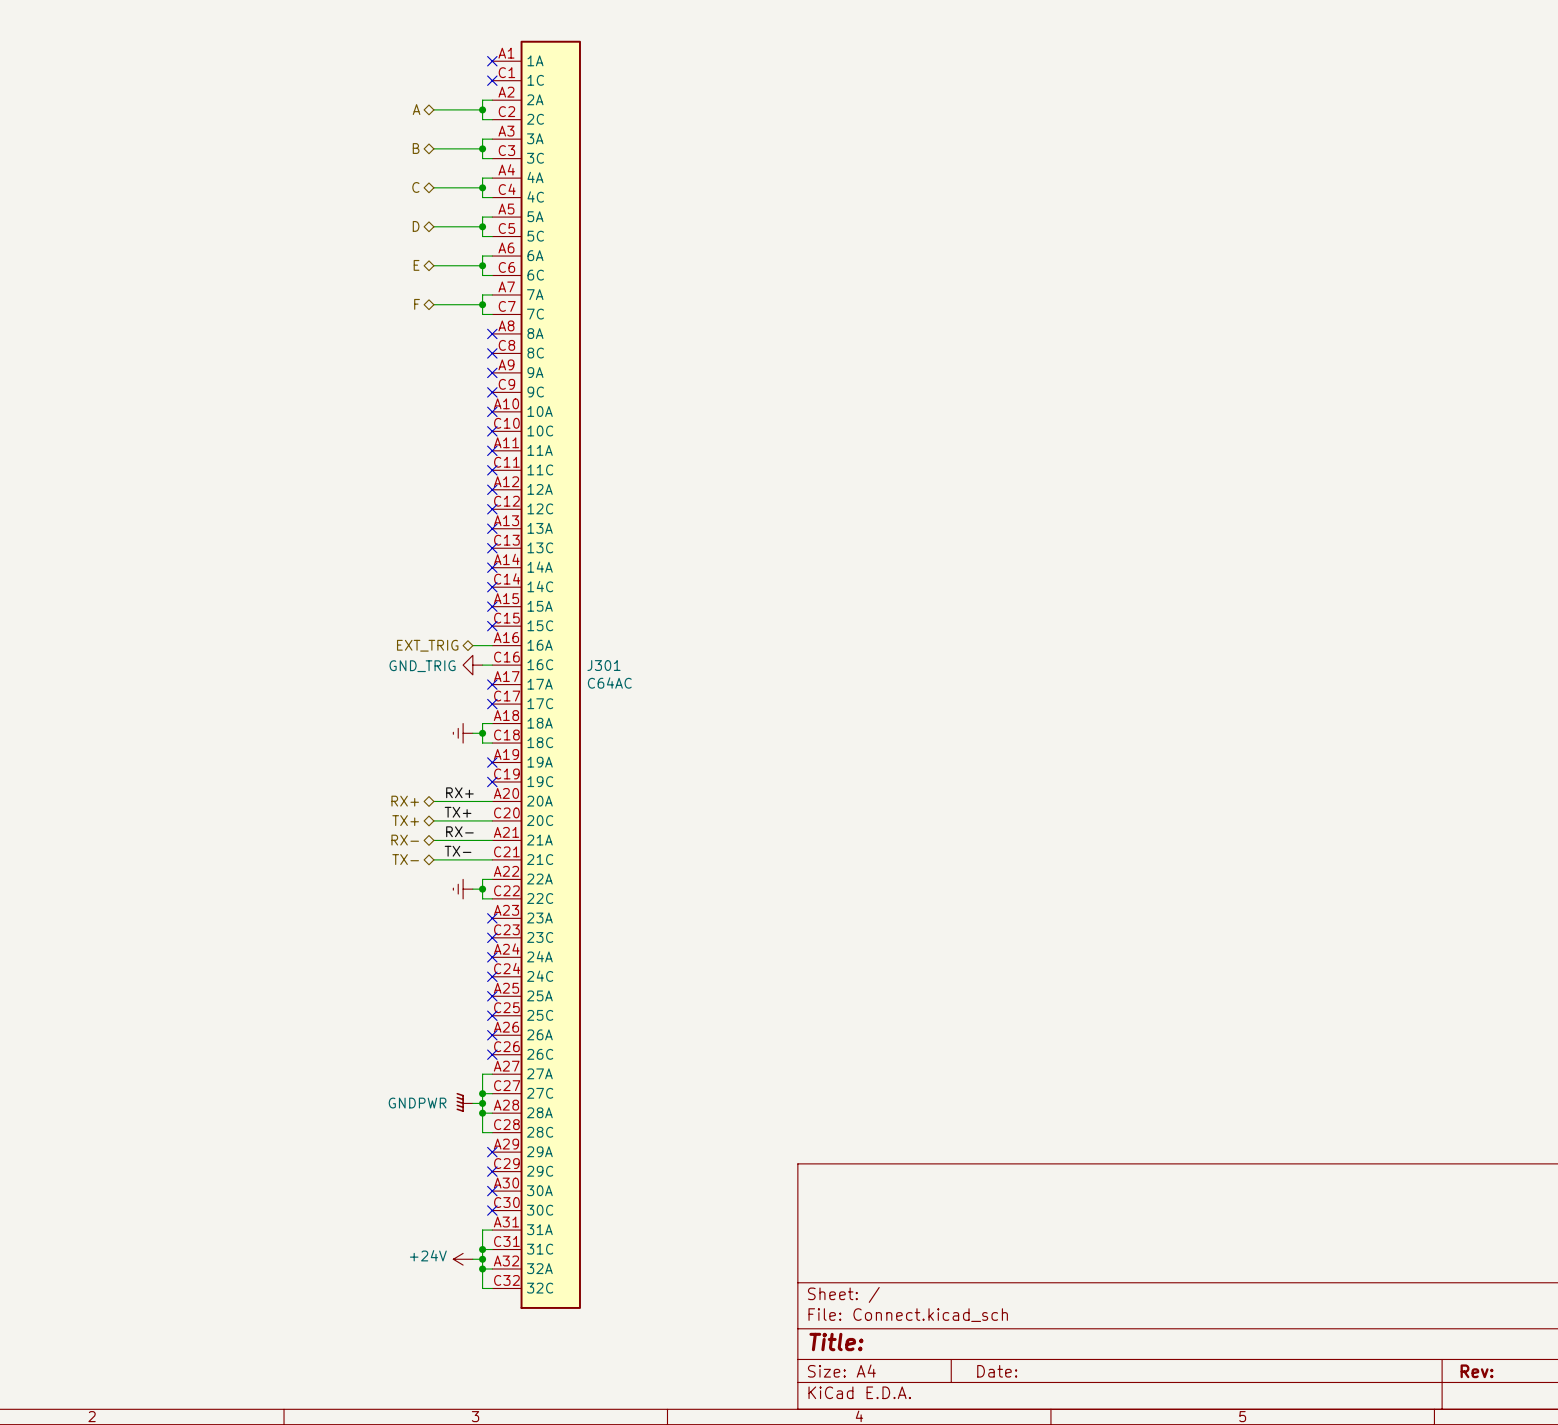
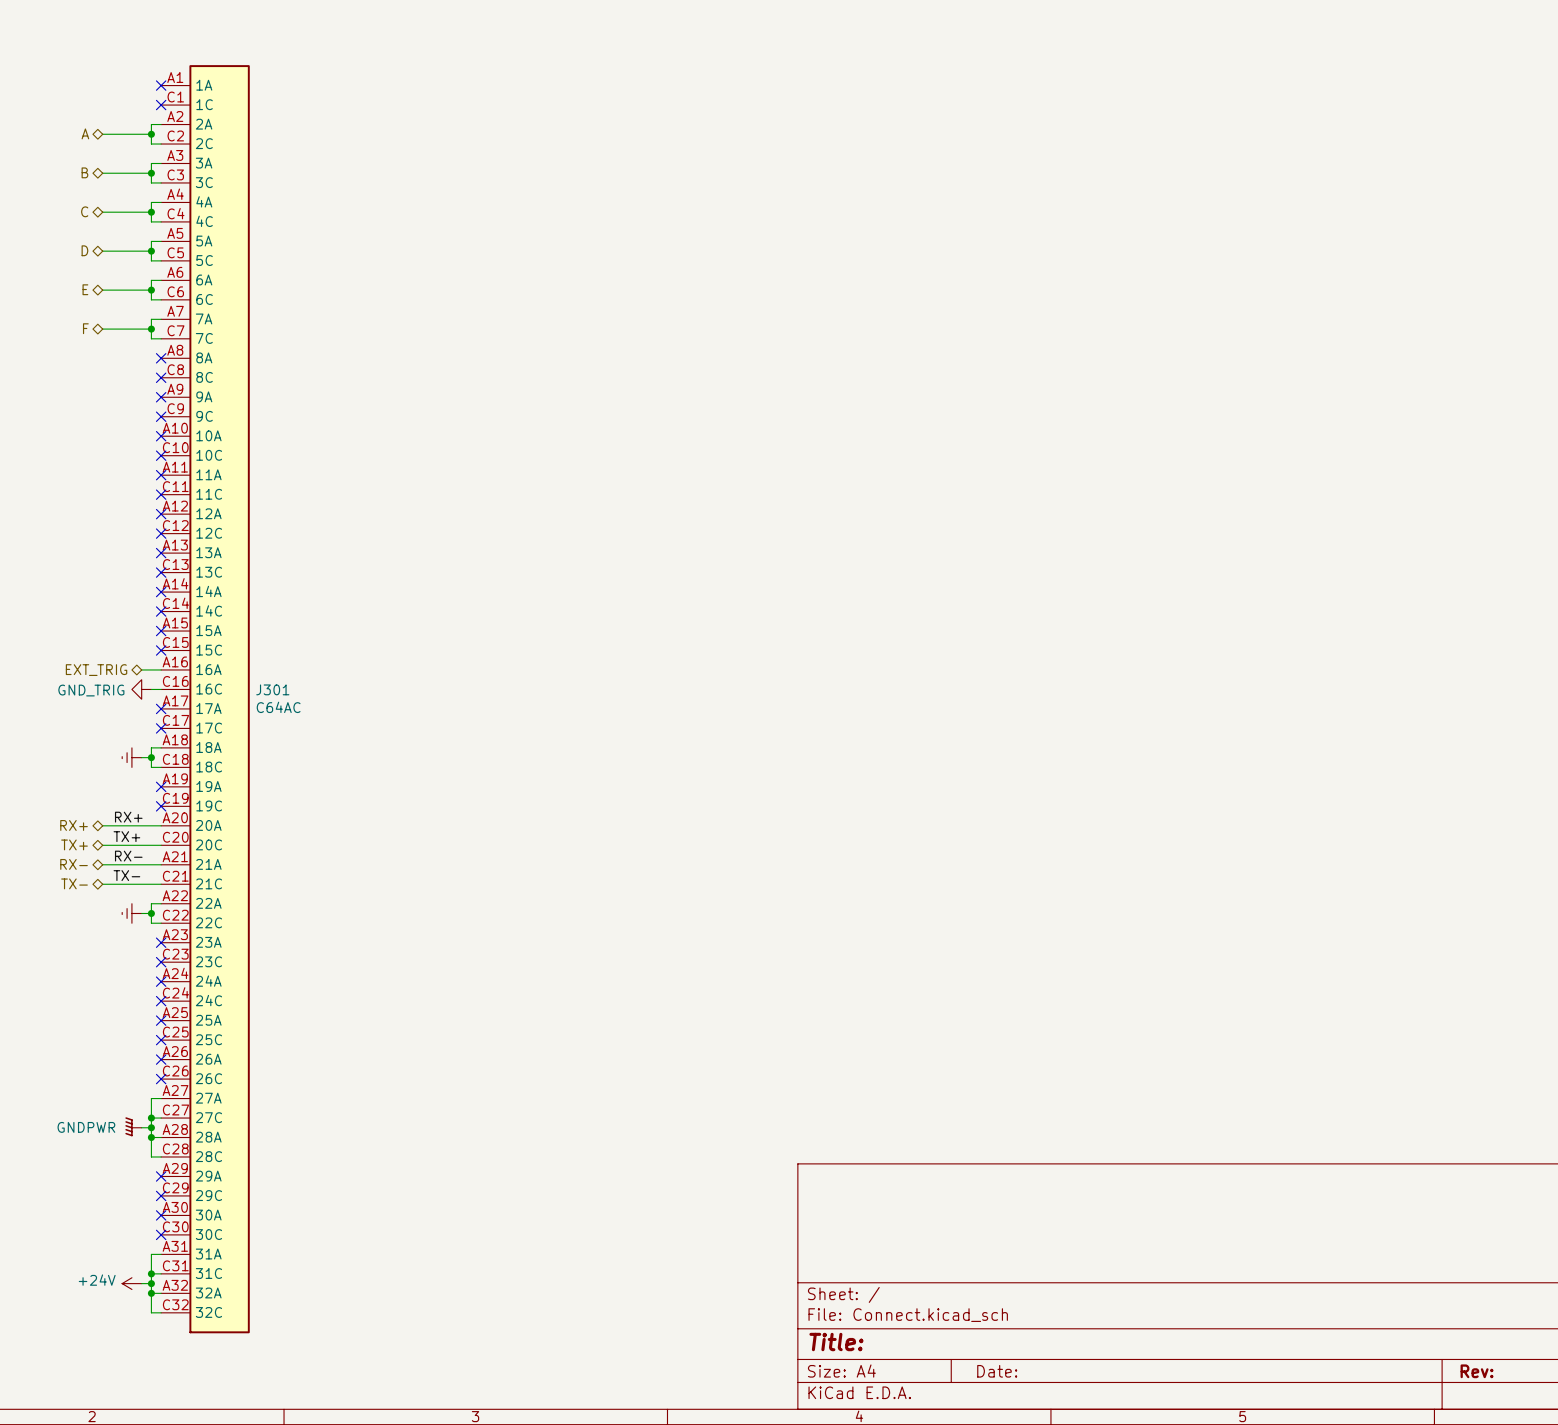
no-connect mark: (492, 61) -> none
no-connect mark: (492, 80) -> none
no-connect mark: none -> (161, 85)
wire: (492, 100) (482, 100) (482, 119) (492, 119) -> none
no-connect mark: none -> (161, 105)
hierarchical label: A (416, 109) -> none
wire: (433, 109) (482, 109) -> none
junction: (482, 109) -> none
wire: none -> (161, 124) (151, 124) (151, 144) (161, 144)
hierarchical label: none -> A (85, 133)
wire: none -> (102, 134) (151, 134)
junction: none -> (151, 134)
wire: (492, 139) (482, 139) (482, 158) (492, 158) -> none
hierarchical label: B (416, 148) -> none
wire: (433, 148) (482, 148) -> none
junction: (482, 148) -> none
wire: none -> (161, 163) (151, 163) (151, 182) (161, 182)
hierarchical label: none -> B (84, 172)
wire: none -> (102, 173) (151, 173)
junction: none -> (151, 173)
wire: (492, 178) (482, 178) (482, 197) (492, 197) -> none
hierarchical label: C (415, 187) -> none
wire: (433, 187) (482, 187) -> none
junction: (482, 187) -> none
wire: none -> (161, 202) (151, 202) (151, 221) (161, 221)
hierarchical label: none -> C (84, 211)
wire: none -> (102, 212) (151, 212)
junction: none -> (151, 212)
wire: (492, 217) (482, 217) (482, 236) (492, 236) -> none
hierarchical label: D (416, 226) -> none
wire: (433, 226) (482, 226) -> none
junction: (482, 226) -> none
wire: none -> (161, 241) (151, 241) (151, 260) (161, 260)
hierarchical label: none -> D (84, 250)
wire: none -> (102, 251) (151, 251)
junction: none -> (151, 251)
wire: (492, 256) (482, 256) (482, 275) (492, 275) -> none
hierarchical label: E (416, 265) -> none
wire: (433, 265) (482, 265) -> none
junction: (482, 265) -> none
wire: none -> (161, 280) (151, 280) (151, 299) (161, 299)
hierarchical label: none -> E (85, 289)
wire: none -> (102, 290) (151, 290)
junction: none -> (151, 290)
wire: (492, 294) (482, 294) (482, 314) (492, 314) -> none
hierarchical label: F (417, 304) -> none
wire: (433, 304) (482, 304) -> none
junction: (482, 304) -> none
wire: none -> (161, 319) (151, 319) (151, 338) (161, 338)
hierarchical label: none -> F (85, 328)
wire: none -> (102, 329) (151, 329)
junction: none -> (151, 329)
no-connect mark: (492, 333) -> none
no-connect mark: (492, 353) -> none
no-connect mark: none -> (161, 358)
no-connect mark: (492, 372) -> none
no-connect mark: none -> (161, 377)
no-connect mark: (492, 392) -> none
no-connect mark: none -> (161, 397)
no-connect mark: (492, 411) -> none
no-connect mark: none -> (161, 416)
no-connect mark: (492, 431) -> none
no-connect mark: none -> (161, 436)
no-connect mark: (492, 450) -> none
no-connect mark: none -> (161, 455)
no-connect mark: (492, 470) -> none
no-connect mark: none -> (161, 475)
no-connect mark: (492, 489) -> none
no-connect mark: none -> (161, 494)
no-connect mark: (492, 509) -> none
no-connect mark: none -> (161, 514)
no-connect mark: (492, 528) -> none
no-connect mark: none -> (161, 533)
no-connect mark: (492, 548) -> none
no-connect mark: none -> (161, 553)
no-connect mark: (492, 567) -> none
no-connect mark: none -> (161, 572)
no-connect mark: (492, 587) -> none
no-connect mark: none -> (161, 592)
no-connect mark: (492, 606) -> none
no-connect mark: none -> (161, 611)
no-connect mark: (492, 626) -> none
no-connect mark: none -> (161, 631)
hierarchical label: EXT_TRIG (427, 645) -> none
wire: (472, 645) (492, 645) -> none
no-connect mark: none -> (161, 650)
power symbol: GND_TRIG (472, 665) -> none
wire: (482, 665) (492, 665) -> none
wire: none -> (141, 669) (161, 669)
hierarchical label: none -> EXT_TRIG (96, 670)
J301 position: (536, 674) -> (205, 699)
no-connect mark: (492, 684) -> none
power symbol: none -> GND_TRIG (141, 689)
wire: none -> (151, 689) (161, 689)
no-connect mark: (492, 704) -> none
no-connect mark: none -> (161, 708)
wire: (492, 723) (482, 723) (482, 743) (492, 743) -> none
no-connect mark: none -> (161, 728)
power symbol: (463, 733) -> none
wire: (472, 733) (482, 733) -> none
junction: (482, 733) -> none
wire: none -> (161, 747) (151, 747) (151, 767) (161, 767)
power symbol: none -> (131, 757)
wire: none -> (141, 757) (151, 757)
junction: none -> (151, 757)
no-connect mark: (492, 762) -> none
no-connect mark: (492, 781) -> none
no-connect mark: none -> (161, 786)
label: RX+ (459, 792) -> none
hierarchical label: RX+ (405, 801) -> none
wire: (433, 801) (492, 801) -> none
no-connect mark: none -> (161, 806)
label: TX+ (458, 812) -> none
label: none -> RX+ (128, 817)
hierarchical label: TX+ (405, 820) -> none
wire: (433, 820) (492, 820) -> none
hierarchical label: none -> RX+ (74, 825)
wire: none -> (102, 825) (161, 825)
label: RX- (459, 831) -> none
label: none -> TX+ (126, 836)
hierarchical label: RX- (405, 840) -> none
wire: (433, 840) (492, 840) -> none
hierarchical label: none -> TX+ (74, 844)
wire: none -> (102, 845) (161, 845)
label: TX- (458, 851) -> none
label: none -> RX- (128, 856)
hierarchical label: TX- (405, 859) -> none
wire: (433, 859) (492, 859) -> none
hierarchical label: none -> RX- (74, 864)
wire: none -> (102, 864) (161, 864)
label: none -> TX- (126, 875)
wire: (492, 879) (482, 879) (482, 898) (492, 898) -> none
hierarchical label: none -> TX- (74, 883)
wire: none -> (102, 884) (161, 884)
power symbol: (463, 889) -> none
wire: (472, 889) (482, 889) -> none
junction: (482, 889) -> none
wire: none -> (161, 903) (151, 903) (151, 923) (161, 923)
power symbol: none -> (131, 913)
wire: none -> (141, 913) (151, 913)
junction: none -> (151, 913)
no-connect mark: (492, 918) -> none
no-connect mark: (492, 937) -> none
no-connect mark: none -> (161, 942)
no-connect mark: (492, 957) -> none
no-connect mark: none -> (161, 962)
no-connect mark: (492, 976) -> none
no-connect mark: none -> (161, 981)
no-connect mark: (492, 996) -> none
no-connect mark: none -> (161, 1001)
no-connect mark: (492, 1015) -> none
no-connect mark: none -> (161, 1020)
no-connect mark: (492, 1035) -> none
no-connect mark: none -> (161, 1040)
no-connect mark: (492, 1054) -> none
no-connect mark: none -> (161, 1059)
wire: (492, 1074) (482, 1074) (482, 1132) (492, 1132) -> none
no-connect mark: none -> (161, 1079)
wire: (482, 1093) (492, 1093) -> none
junction: (482, 1093) -> none
wire: none -> (161, 1098) (151, 1098) (151, 1156) (161, 1156)
power symbol: GNDPWR (464, 1102) -> none
wire: (472, 1103) (482, 1103) -> none
junction: (482, 1103) -> none
wire: (482, 1113) (492, 1113) -> none
junction: (482, 1113) -> none
wire: none -> (151, 1118) (161, 1118)
junction: none -> (151, 1118)
power symbol: none -> GNDPWR (133, 1126)
wire: none -> (141, 1127) (151, 1127)
junction: none -> (151, 1127)
wire: none -> (151, 1137) (161, 1137)
junction: none -> (151, 1137)
no-connect mark: (492, 1152) -> none
no-connect mark: (492, 1171) -> none
no-connect mark: none -> (161, 1176)
no-connect mark: (492, 1191) -> none
no-connect mark: none -> (161, 1195)
no-connect mark: (492, 1210) -> none
no-connect mark: none -> (161, 1215)
wire: (492, 1230) (482, 1230) (482, 1288) (492, 1288) -> none
no-connect mark: none -> (161, 1234)
wire: (482, 1249) (492, 1249) -> none
junction: (482, 1249) -> none
wire: none -> (161, 1254) (151, 1254) (151, 1312) (161, 1312)
power symbol: +24V (463, 1259) -> none
wire: (472, 1259) (482, 1259) -> none
junction: (482, 1259) -> none
wire: (482, 1269) (492, 1269) -> none
junction: (482, 1269) -> none
wire: none -> (151, 1273) (161, 1273)
junction: none -> (151, 1273)
power symbol: none -> +24V (131, 1283)
wire: none -> (141, 1283) (151, 1283)
junction: none -> (151, 1283)
wire: none -> (151, 1293) (161, 1293)
junction: none -> (151, 1293)

